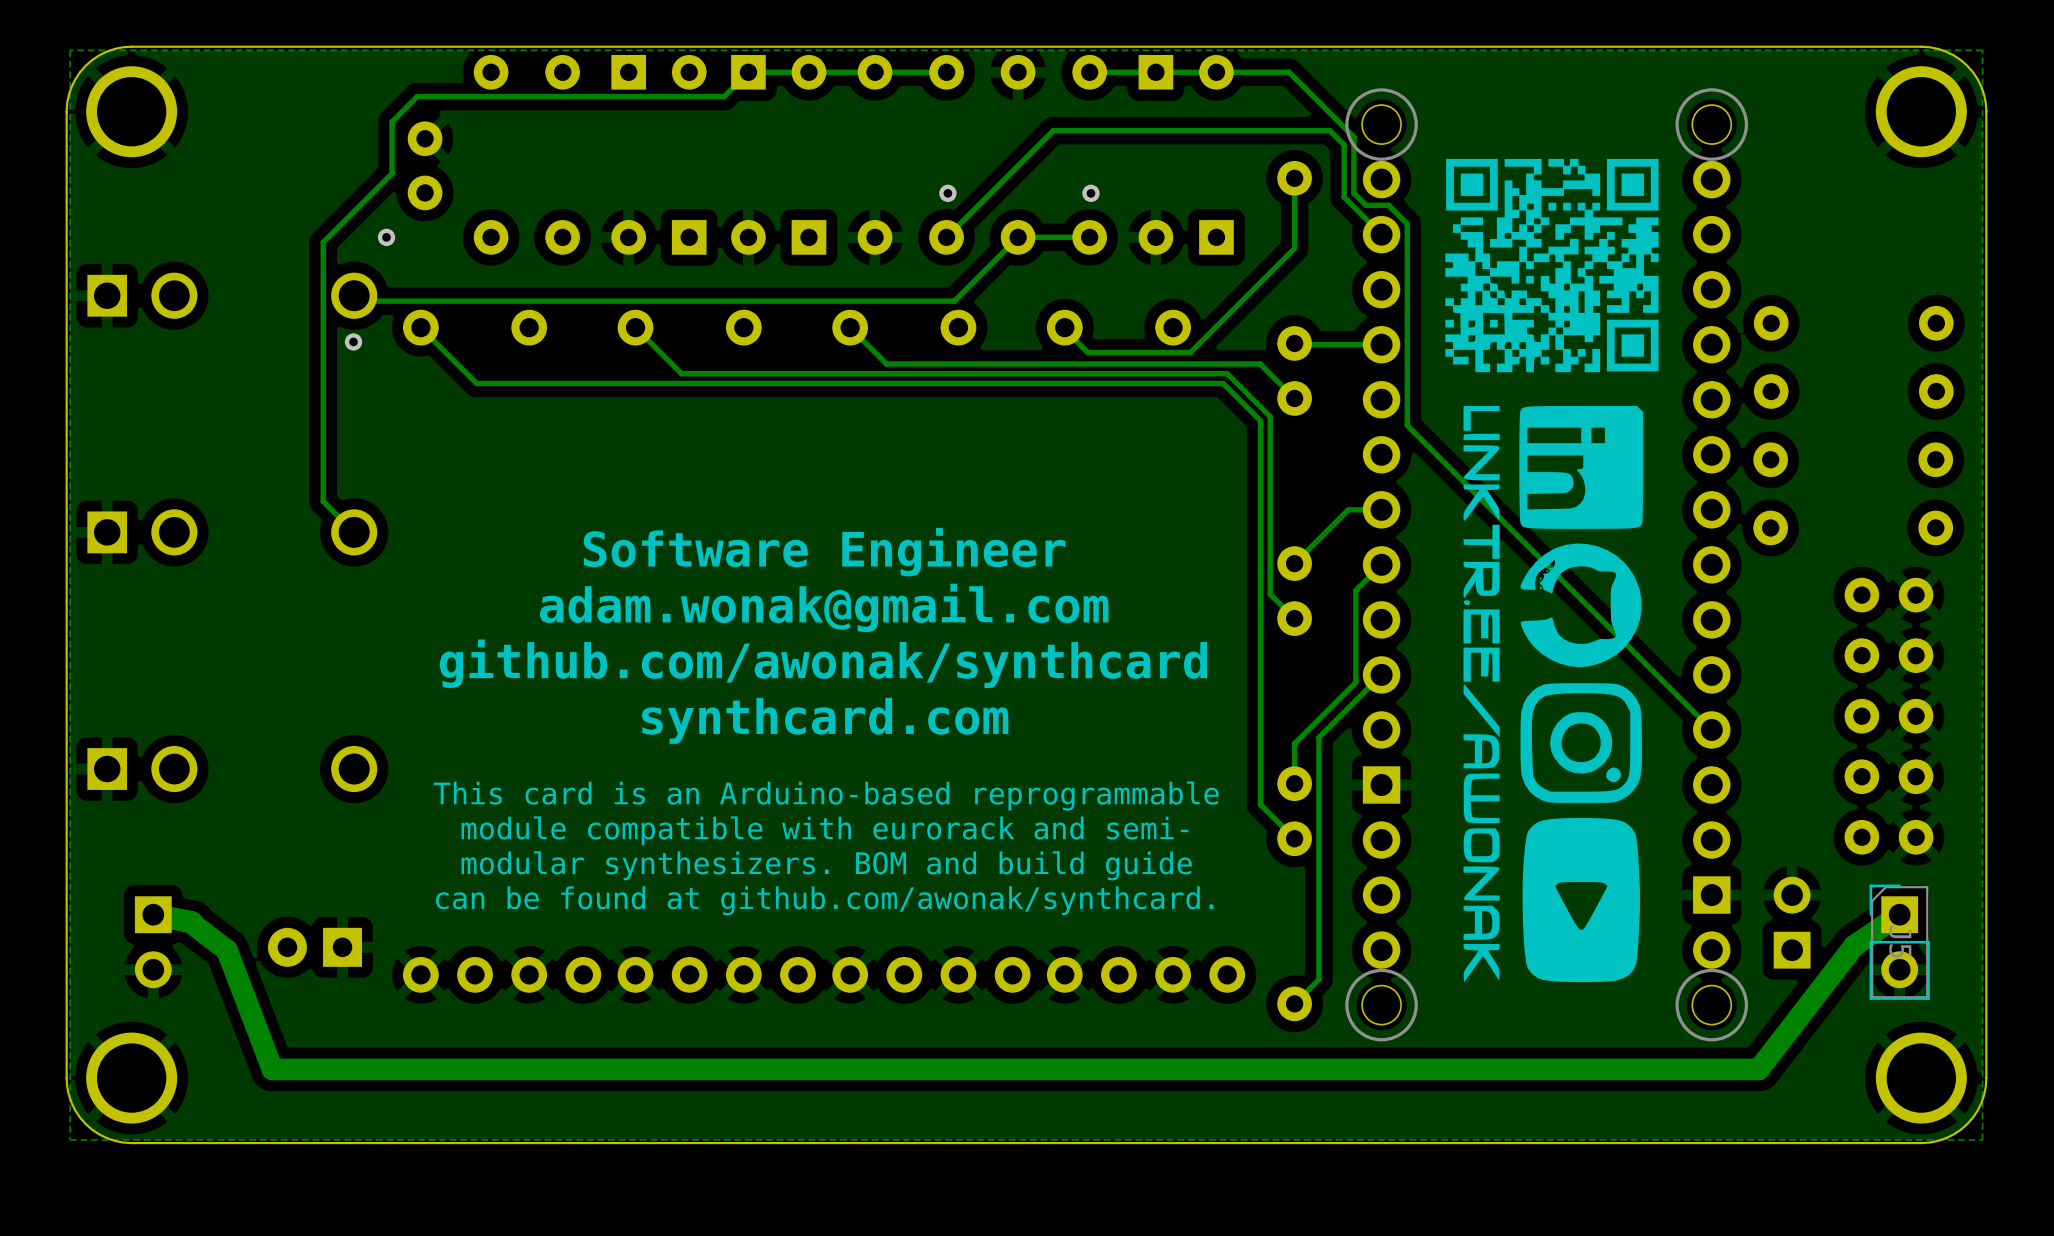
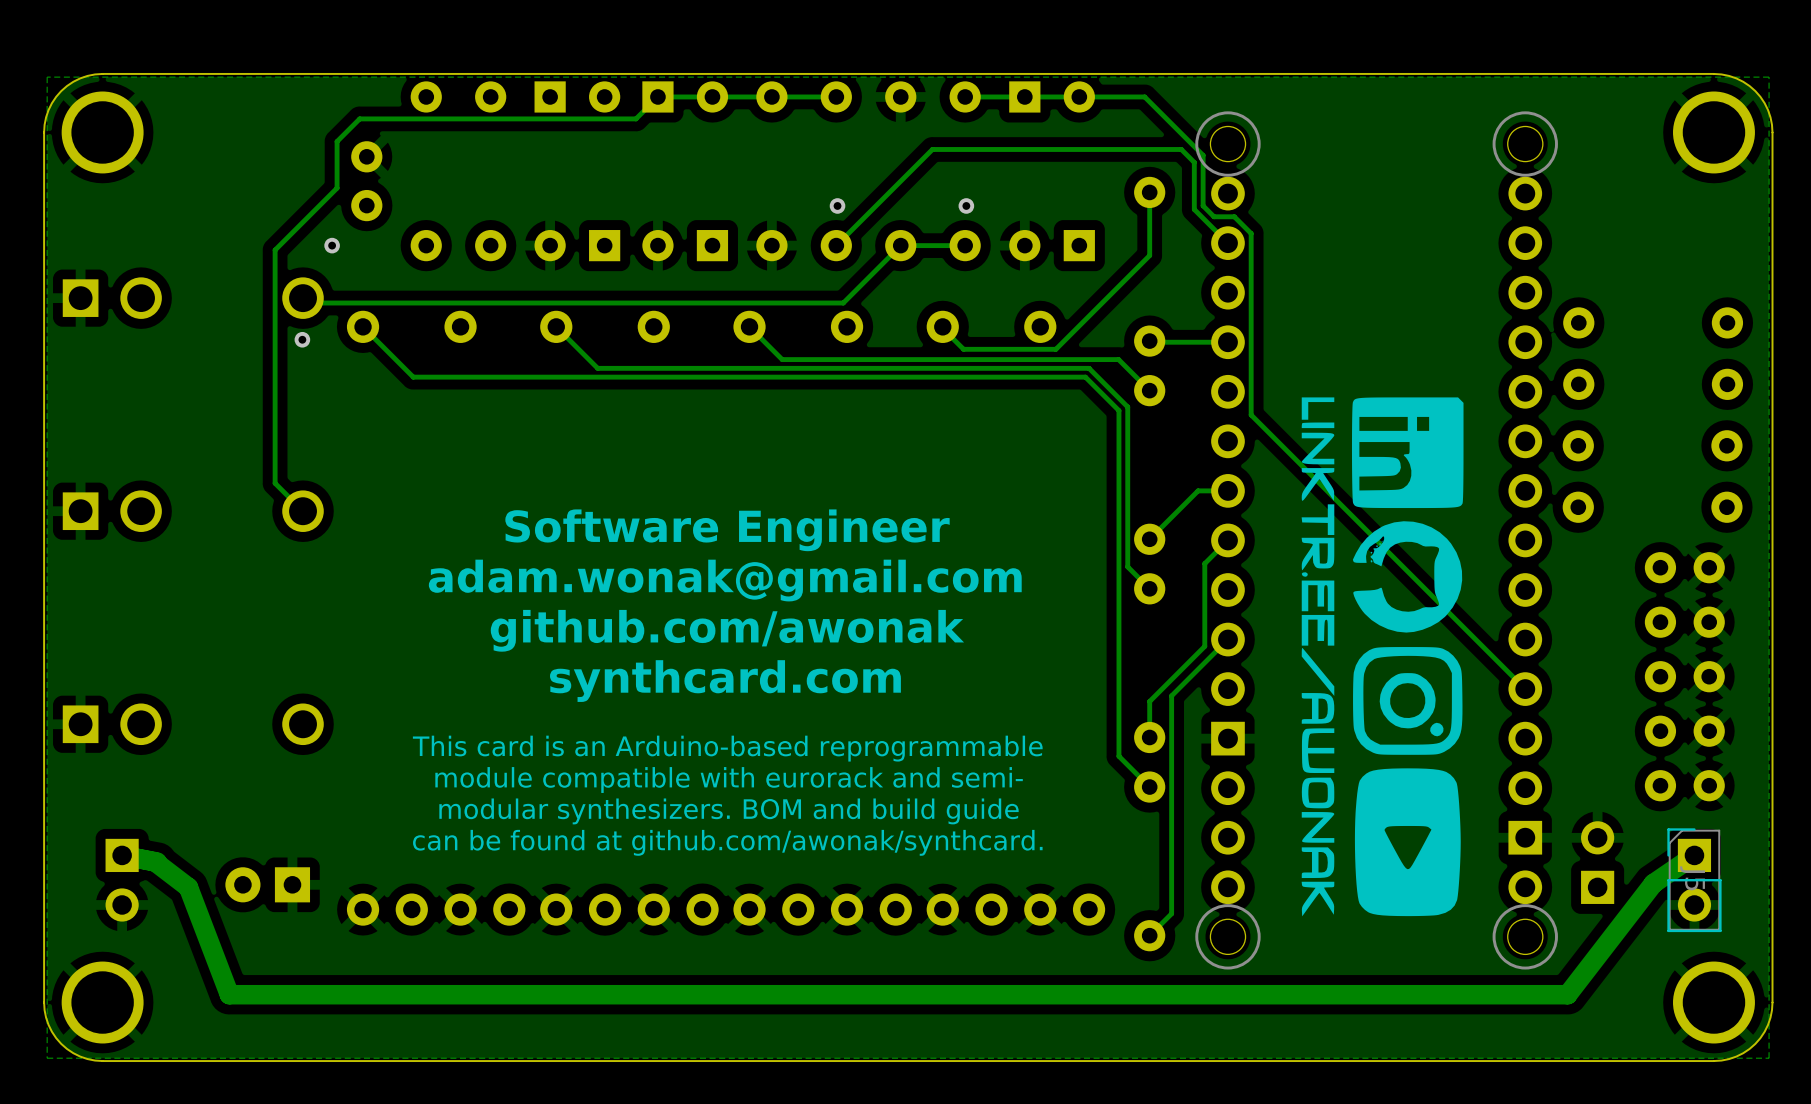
drawing: [1445, 158, 1659, 373] -> none
text: github.com/awonak/synthcard (823, 663) -> github.com/awonak (727, 630)

